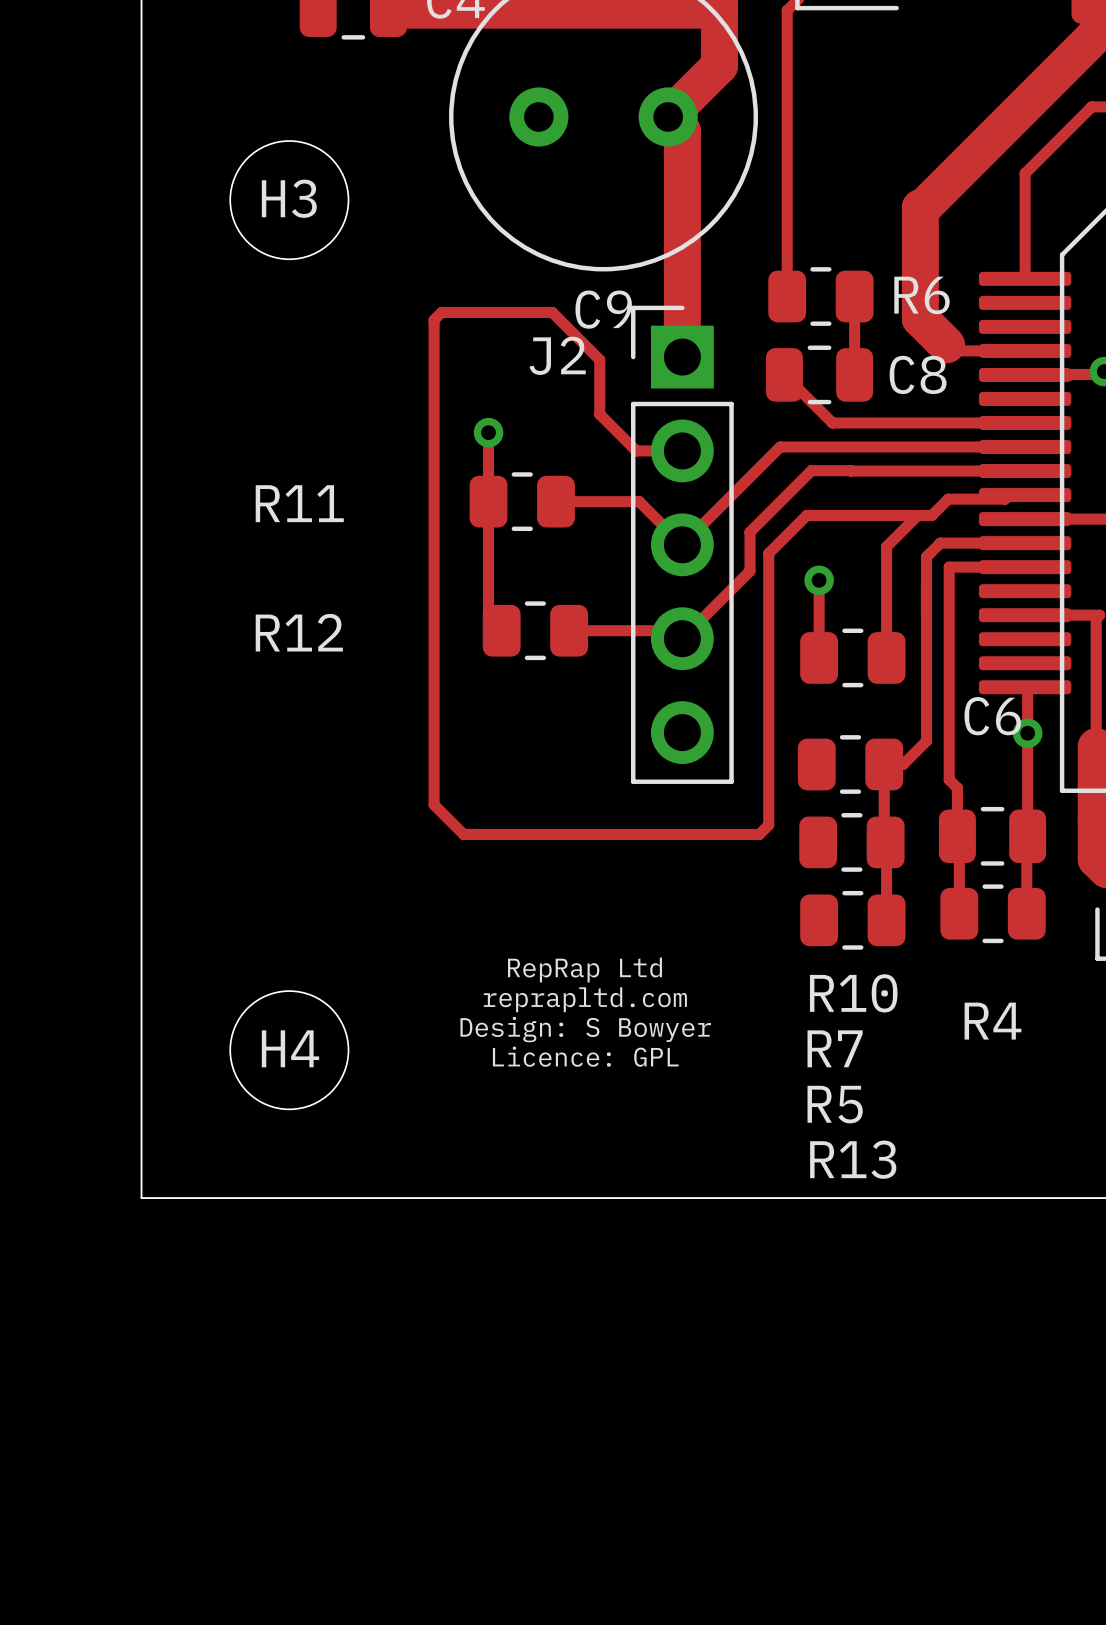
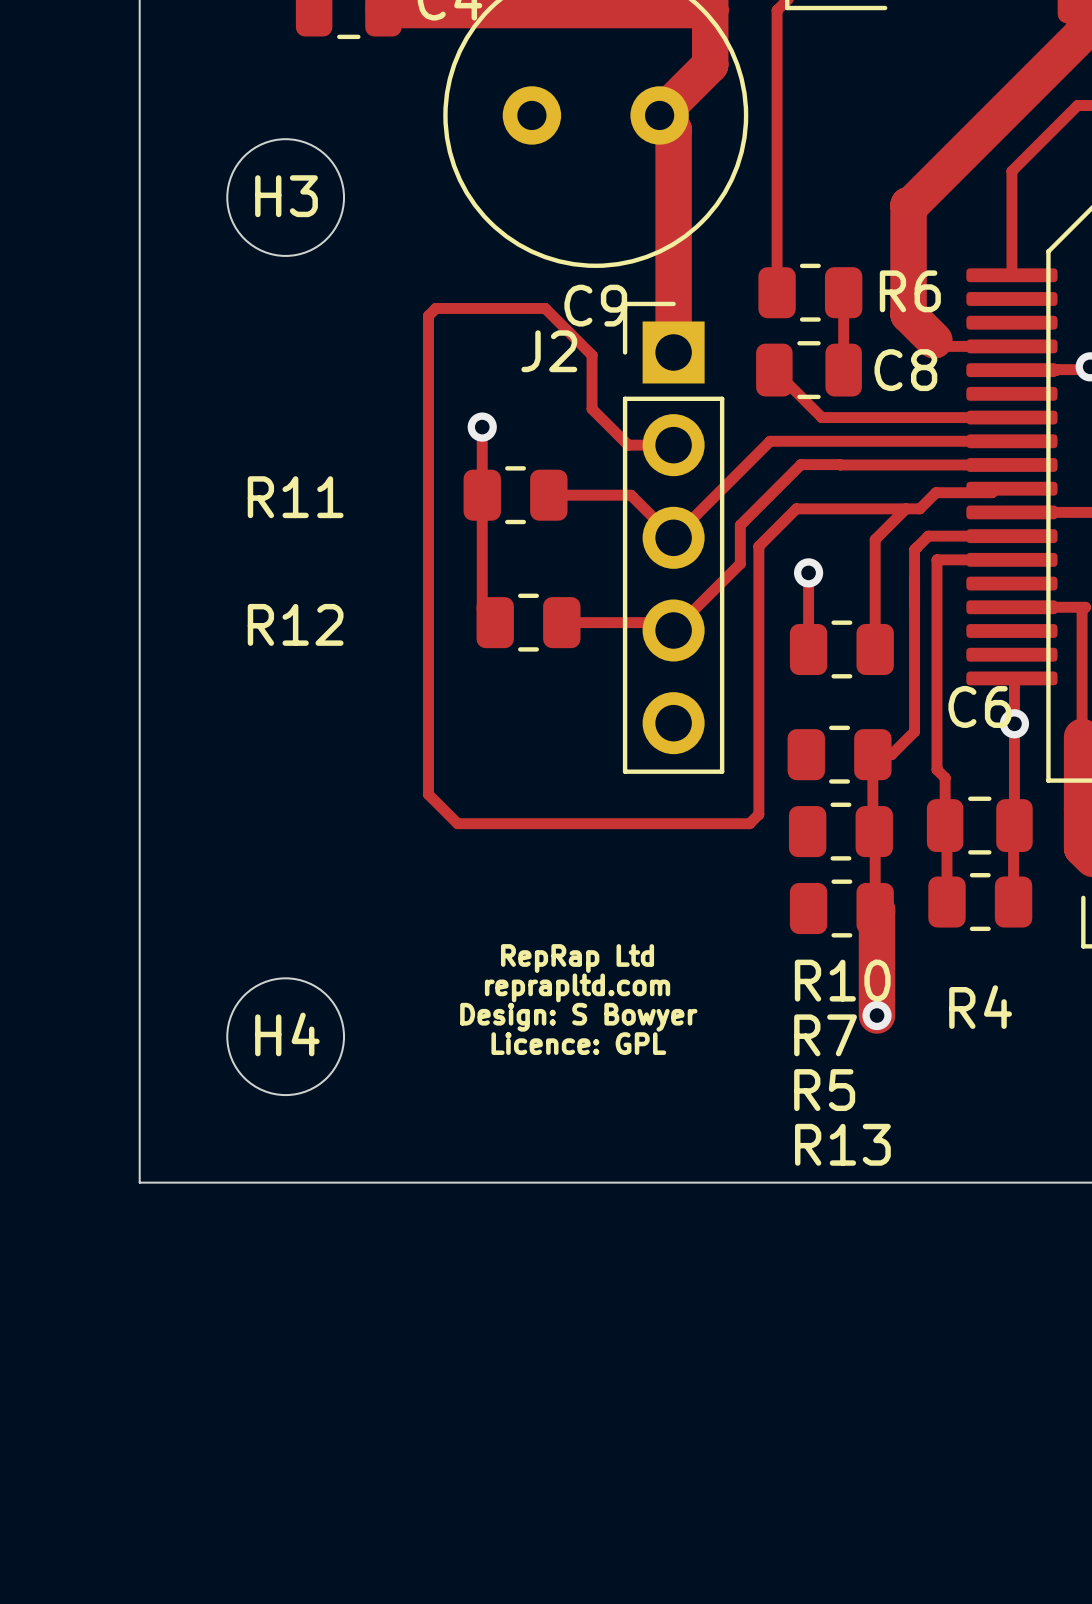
track: none -> (875, 908) (877, 910) (877, 1015)
via: none -> (877, 1015)

